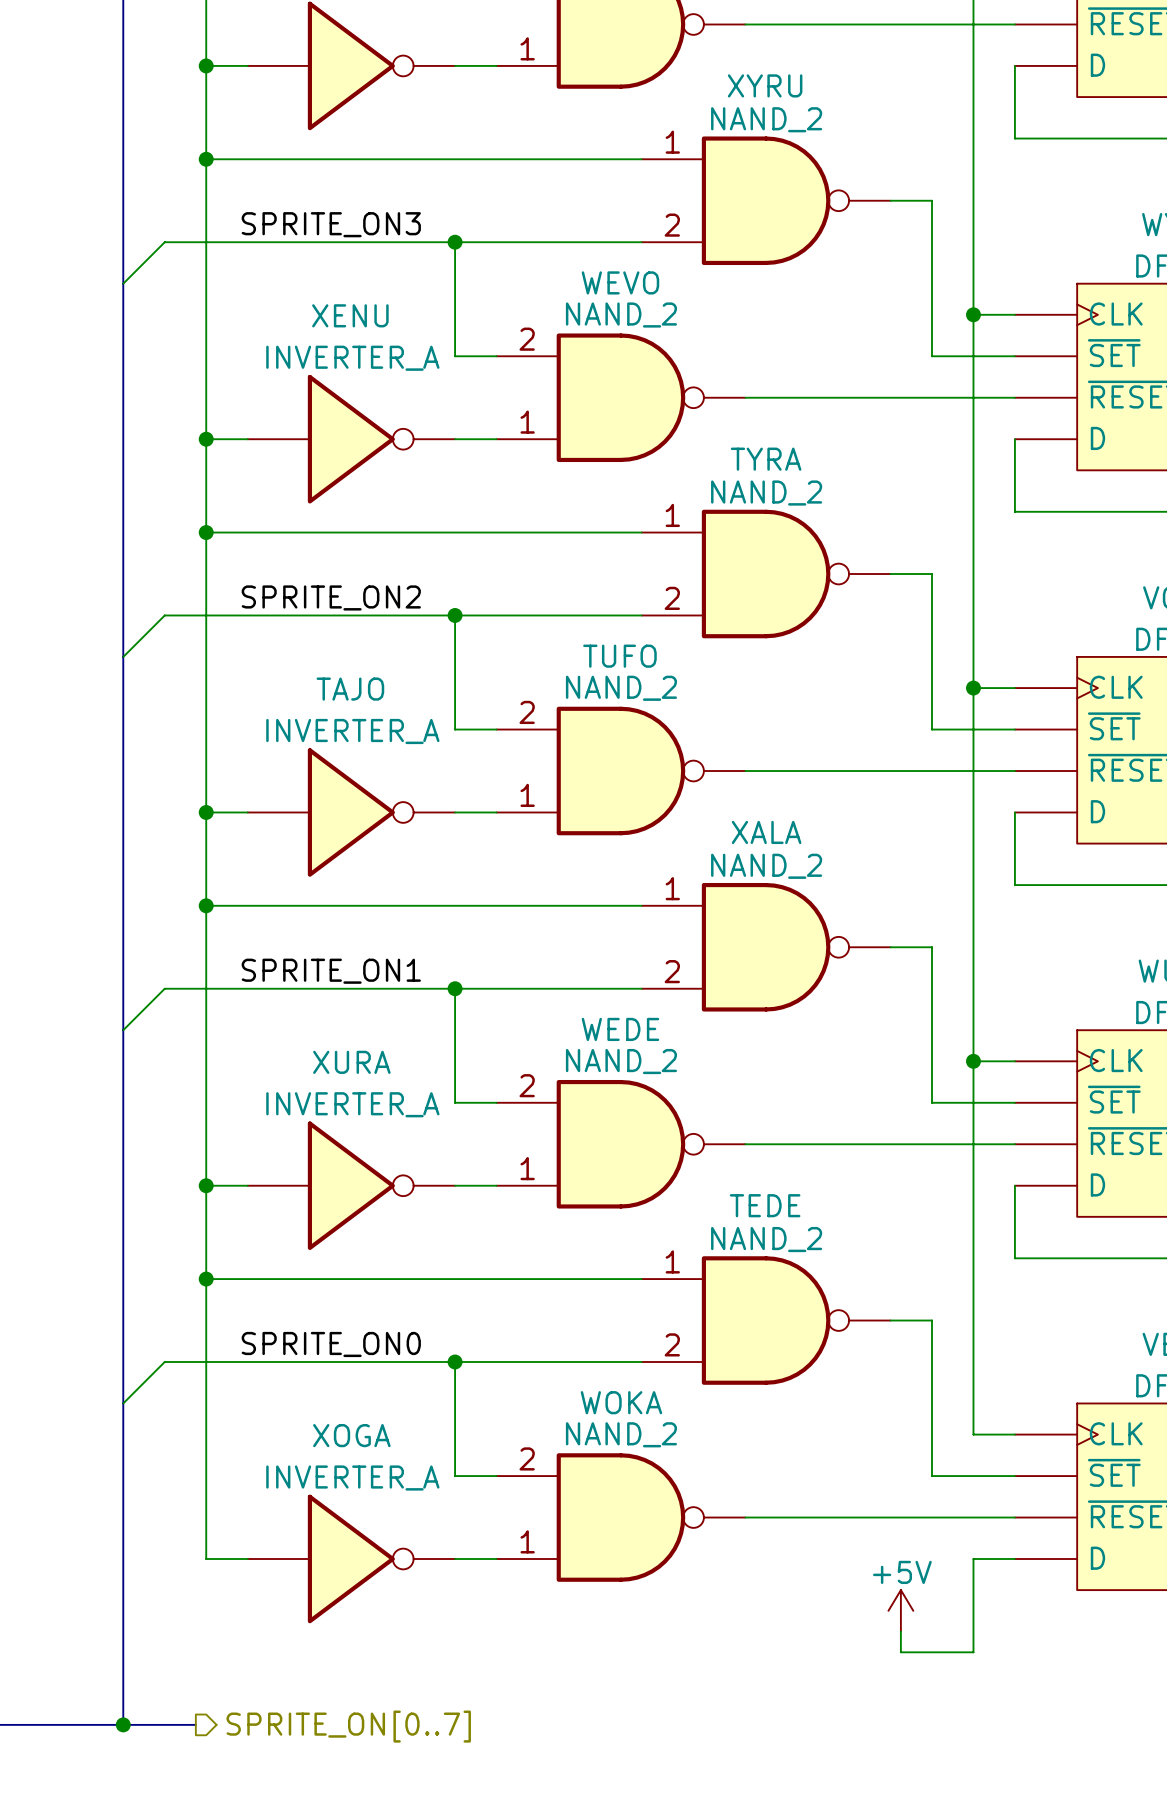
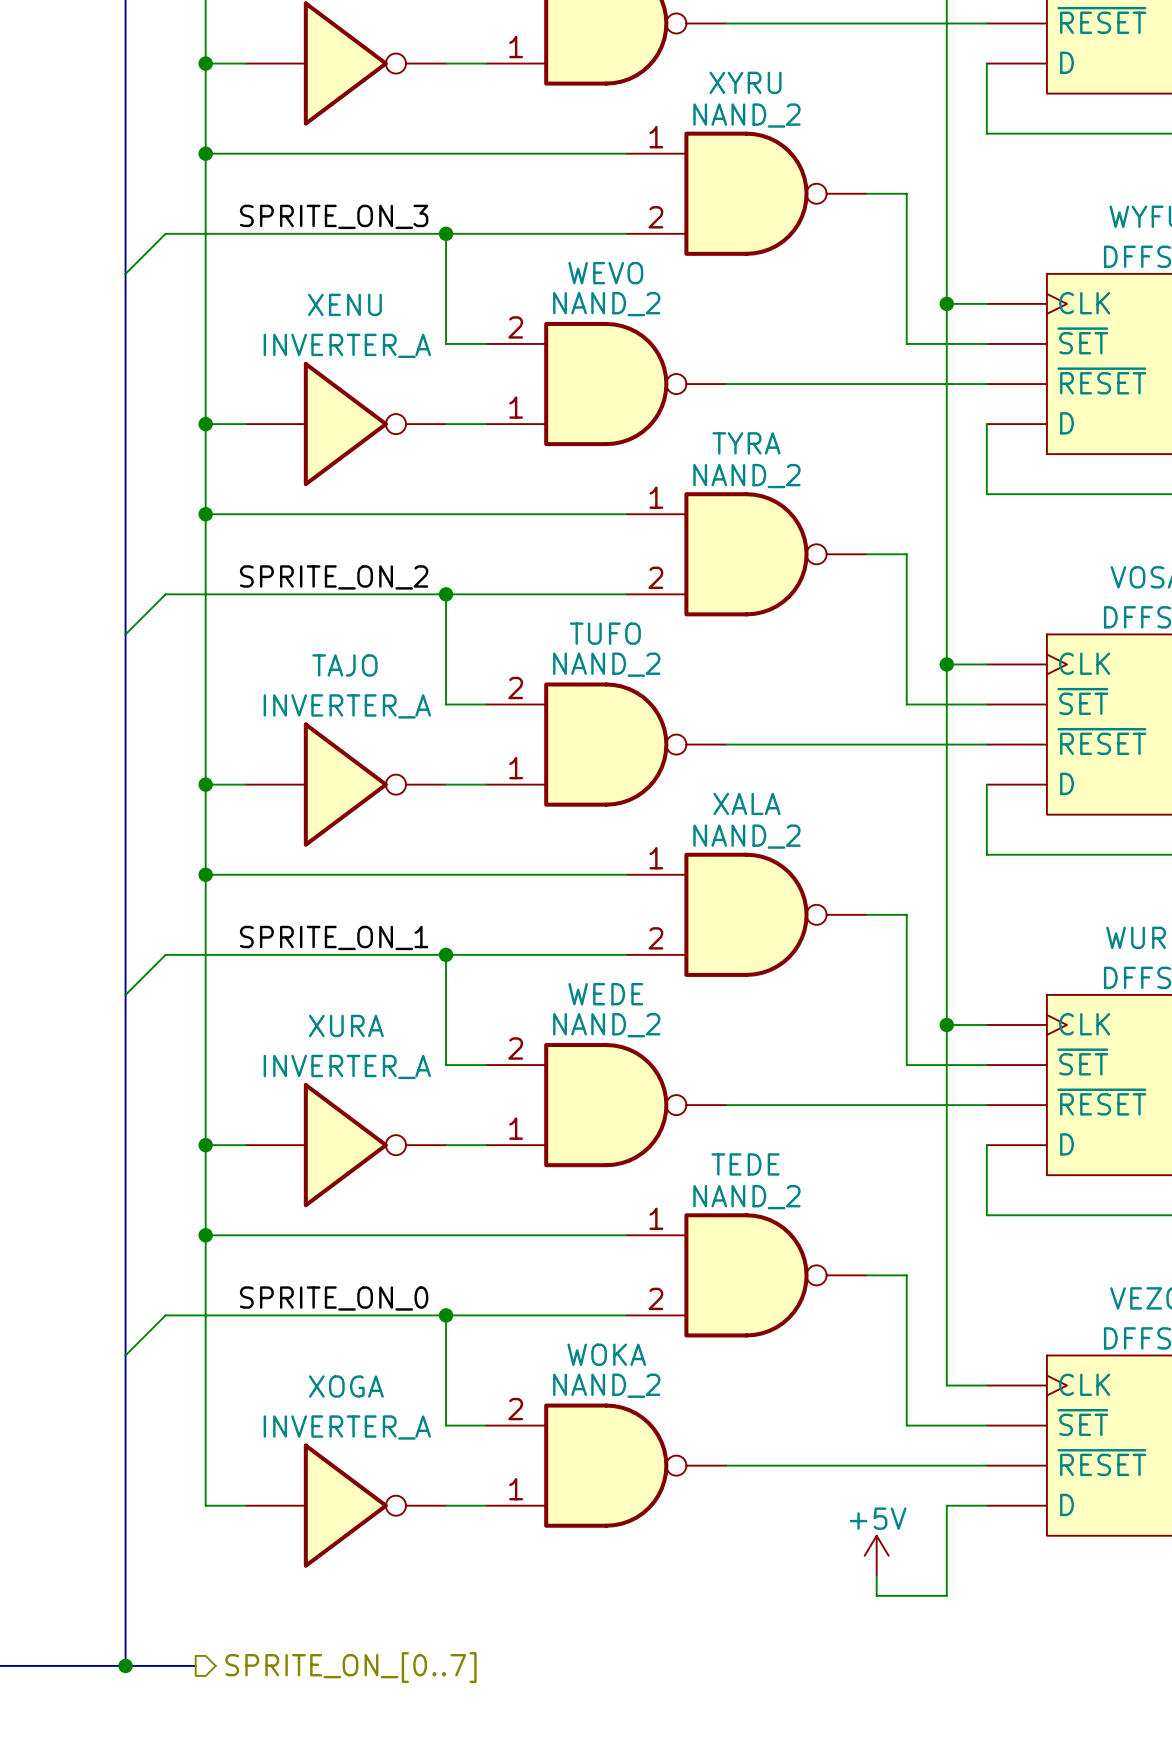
label: SPRITE_ON3 (331, 224) -> SPRITE_ON_3 (334, 216)
label: SPRITE_ON2 (331, 597) -> SPRITE_ON_2 (334, 577)
label: SPRITE_ON1 (331, 971) -> SPRITE_ON_1 (334, 937)
label: SPRITE_ON0 (331, 1344) -> SPRITE_ON_0 (334, 1298)
hierarchical label: SPRITE_ON[0..7] (348, 1726) -> SPRITE_ON_[0..7] (350, 1667)

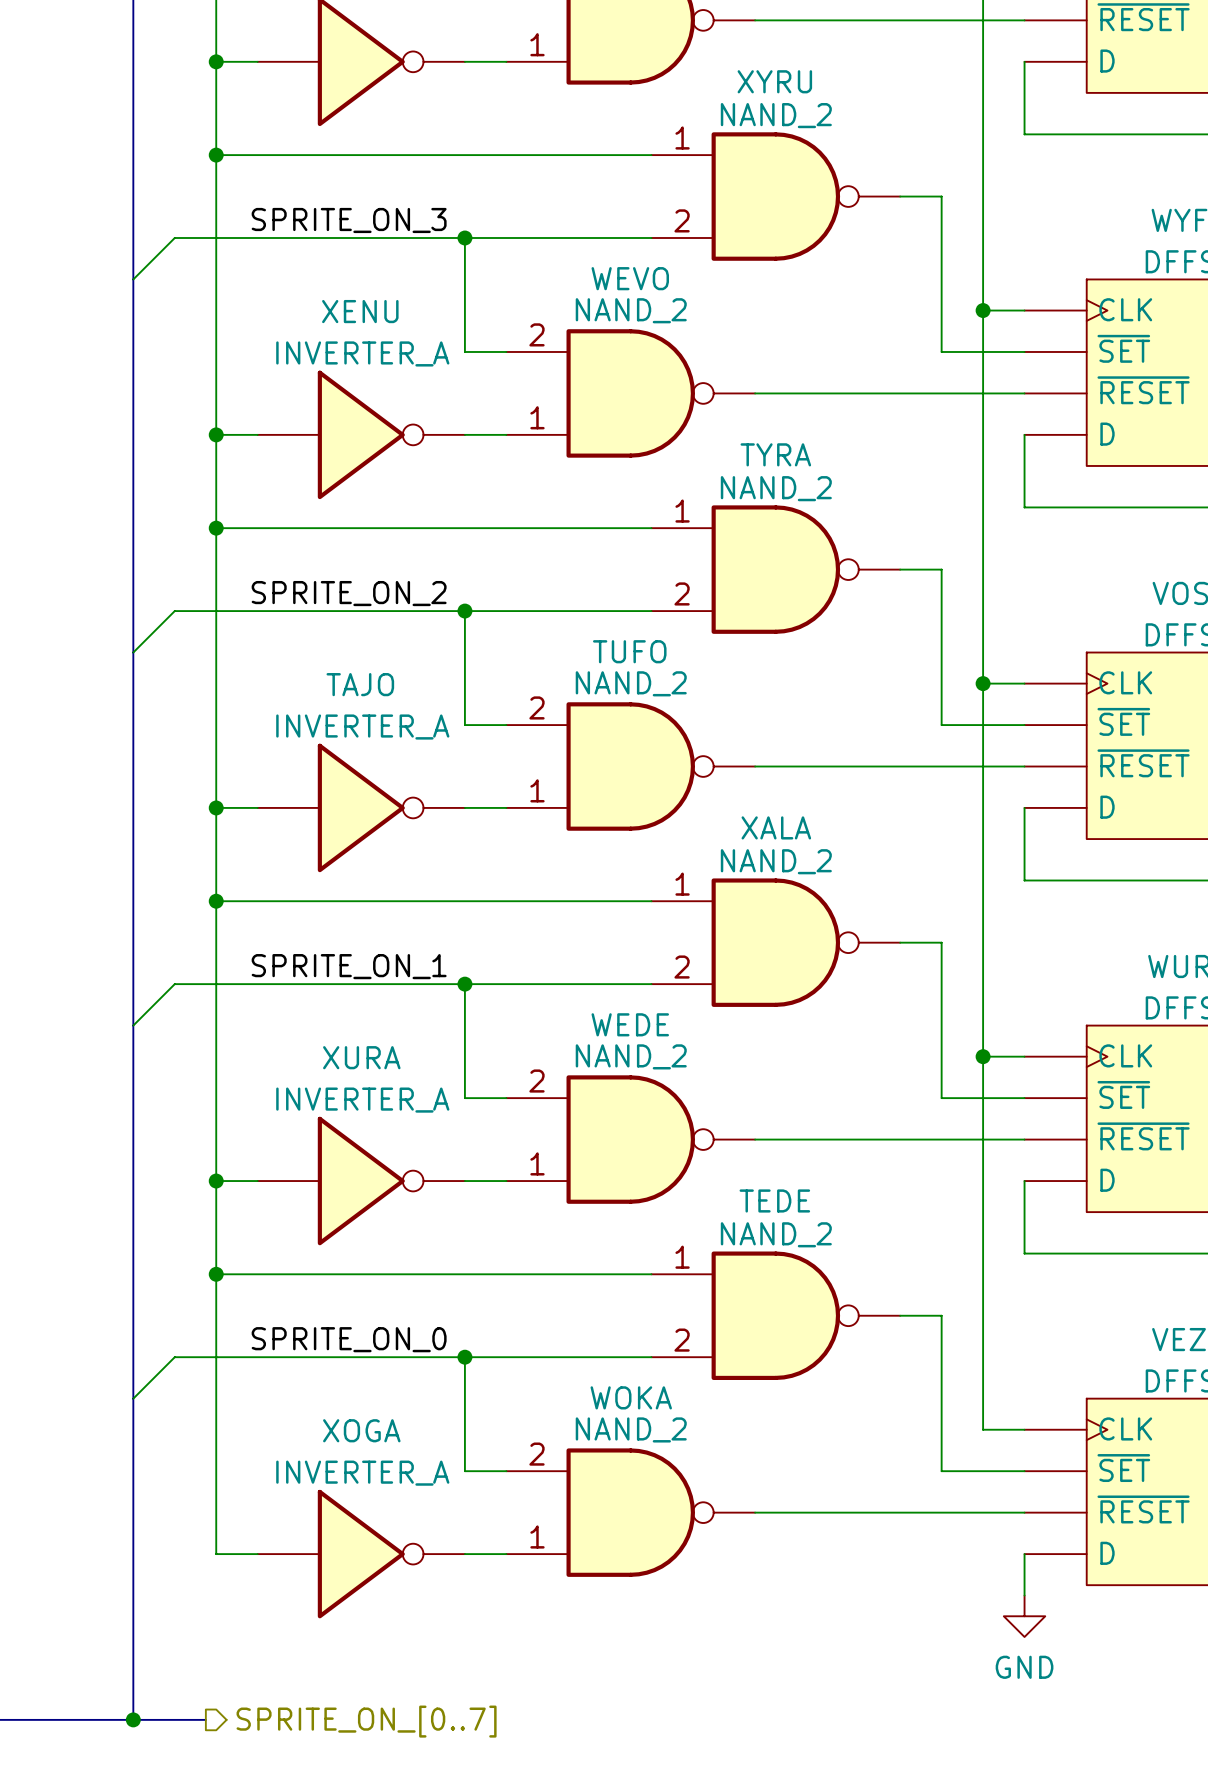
wire: (986, 1505) (946, 1505) (946, 1595) (876, 1595) (876, 1575) -> (1024, 1554) (1024, 1595)
power symbol: +5V (876, 1555) -> none
power symbol: none -> GND (1024, 1616)

